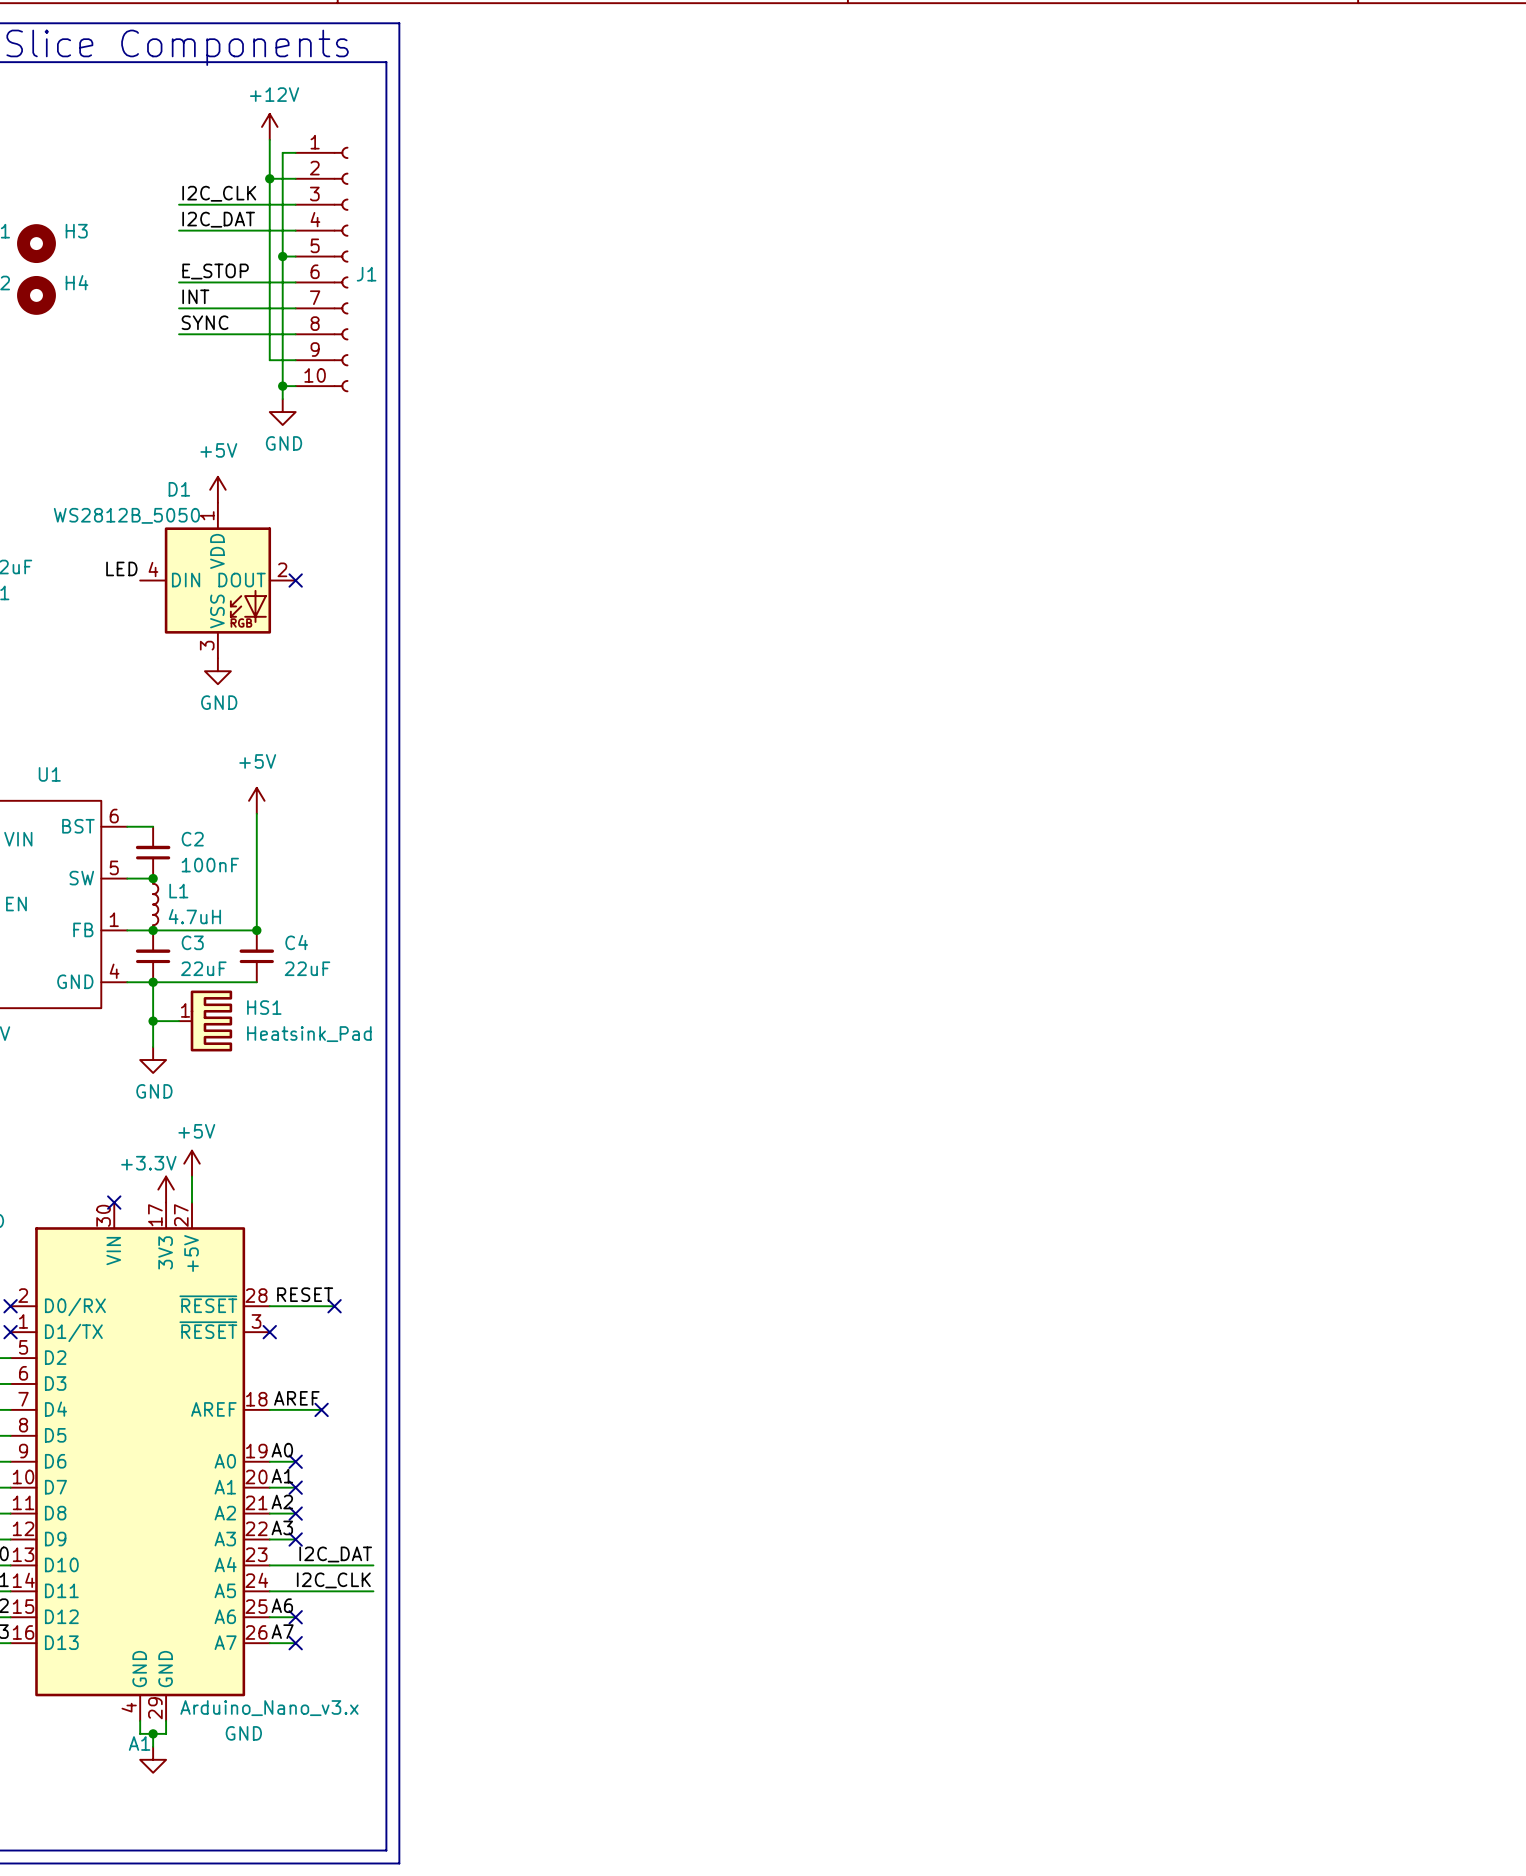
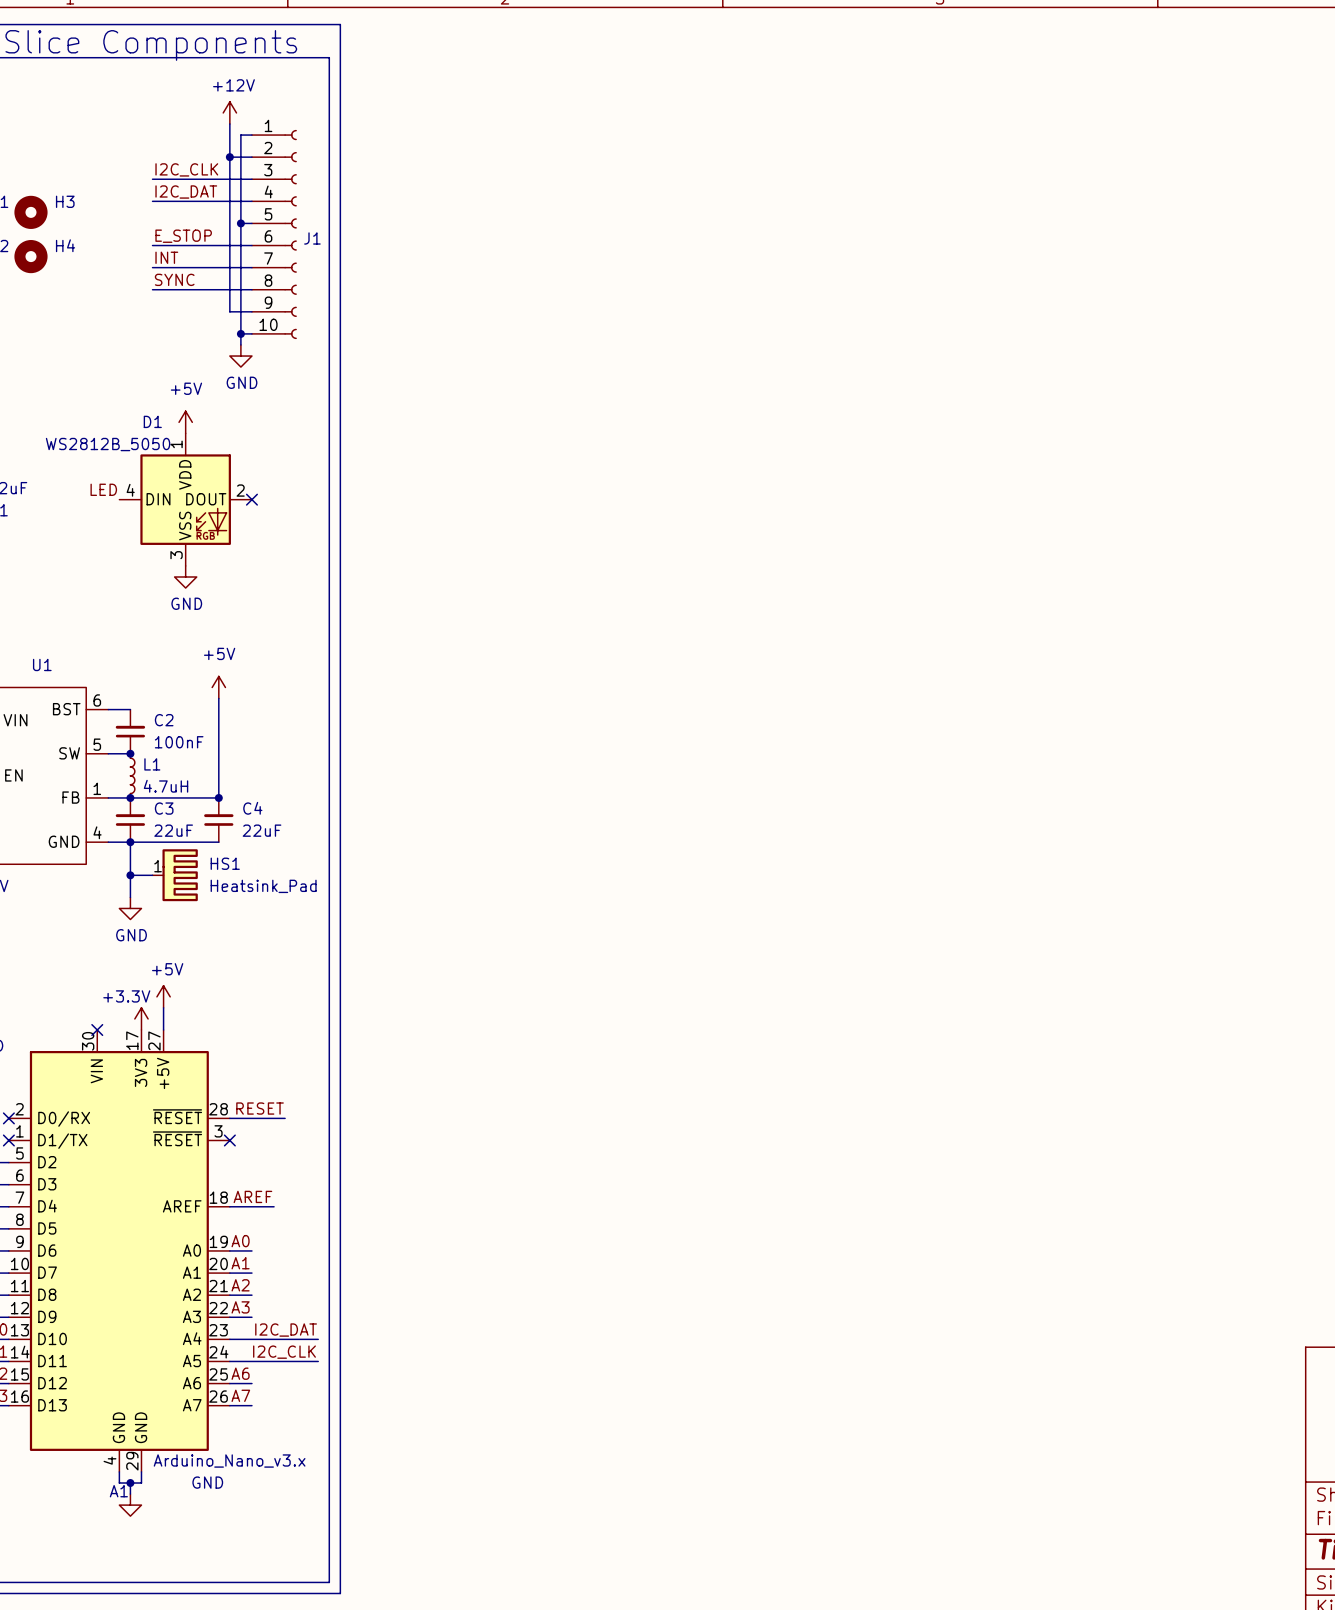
no-connect mark: (334, 1306) -> none
no-connect mark: (321, 1409) -> none
no-connect mark: (295, 1461) -> none
no-connect mark: (295, 1487) -> none
no-connect mark: (295, 1513) -> none
no-connect mark: (295, 1539) -> none
no-connect mark: (295, 1617) -> none
no-connect mark: (295, 1643) -> none

